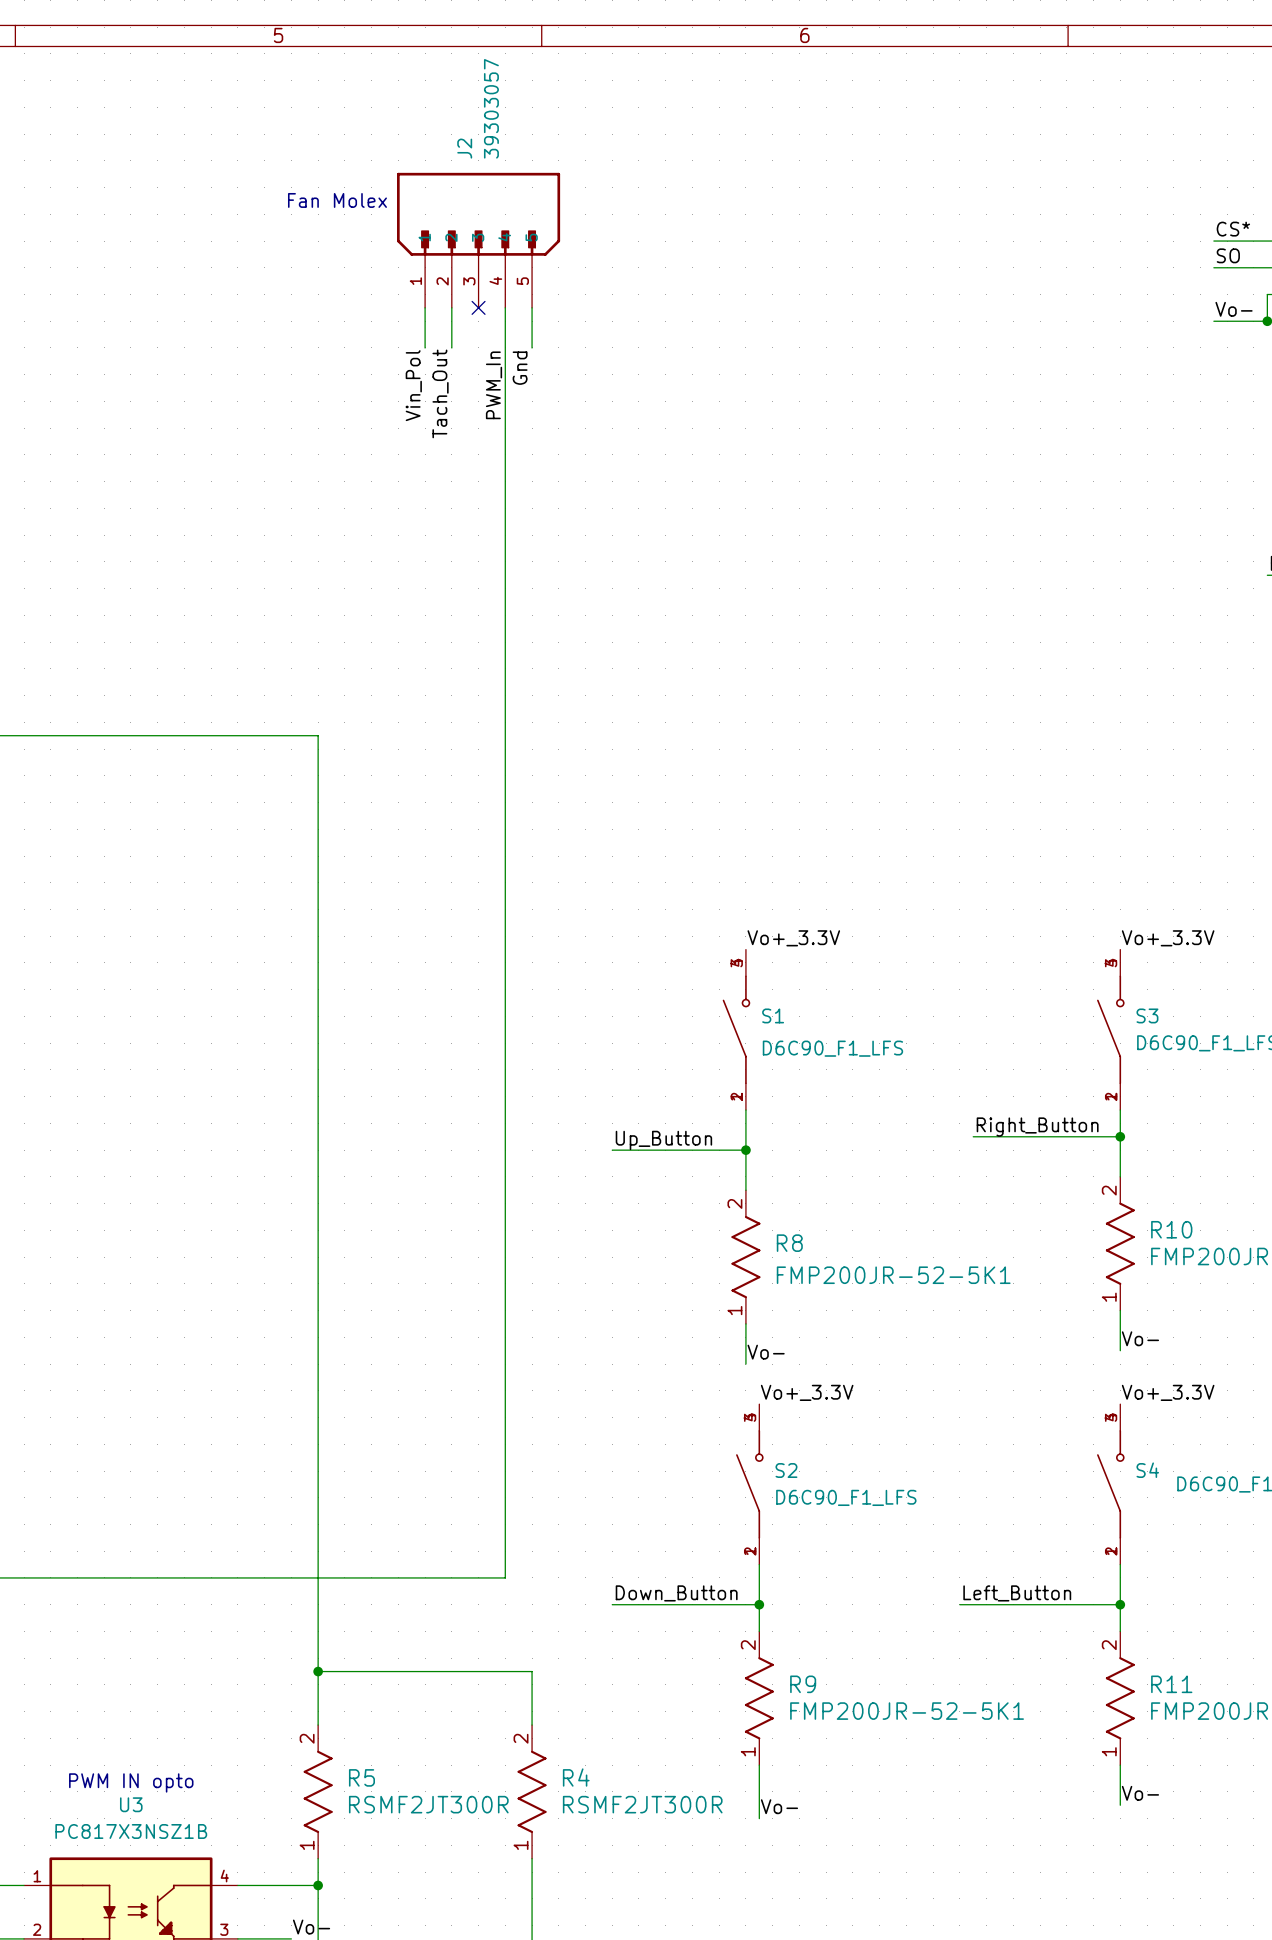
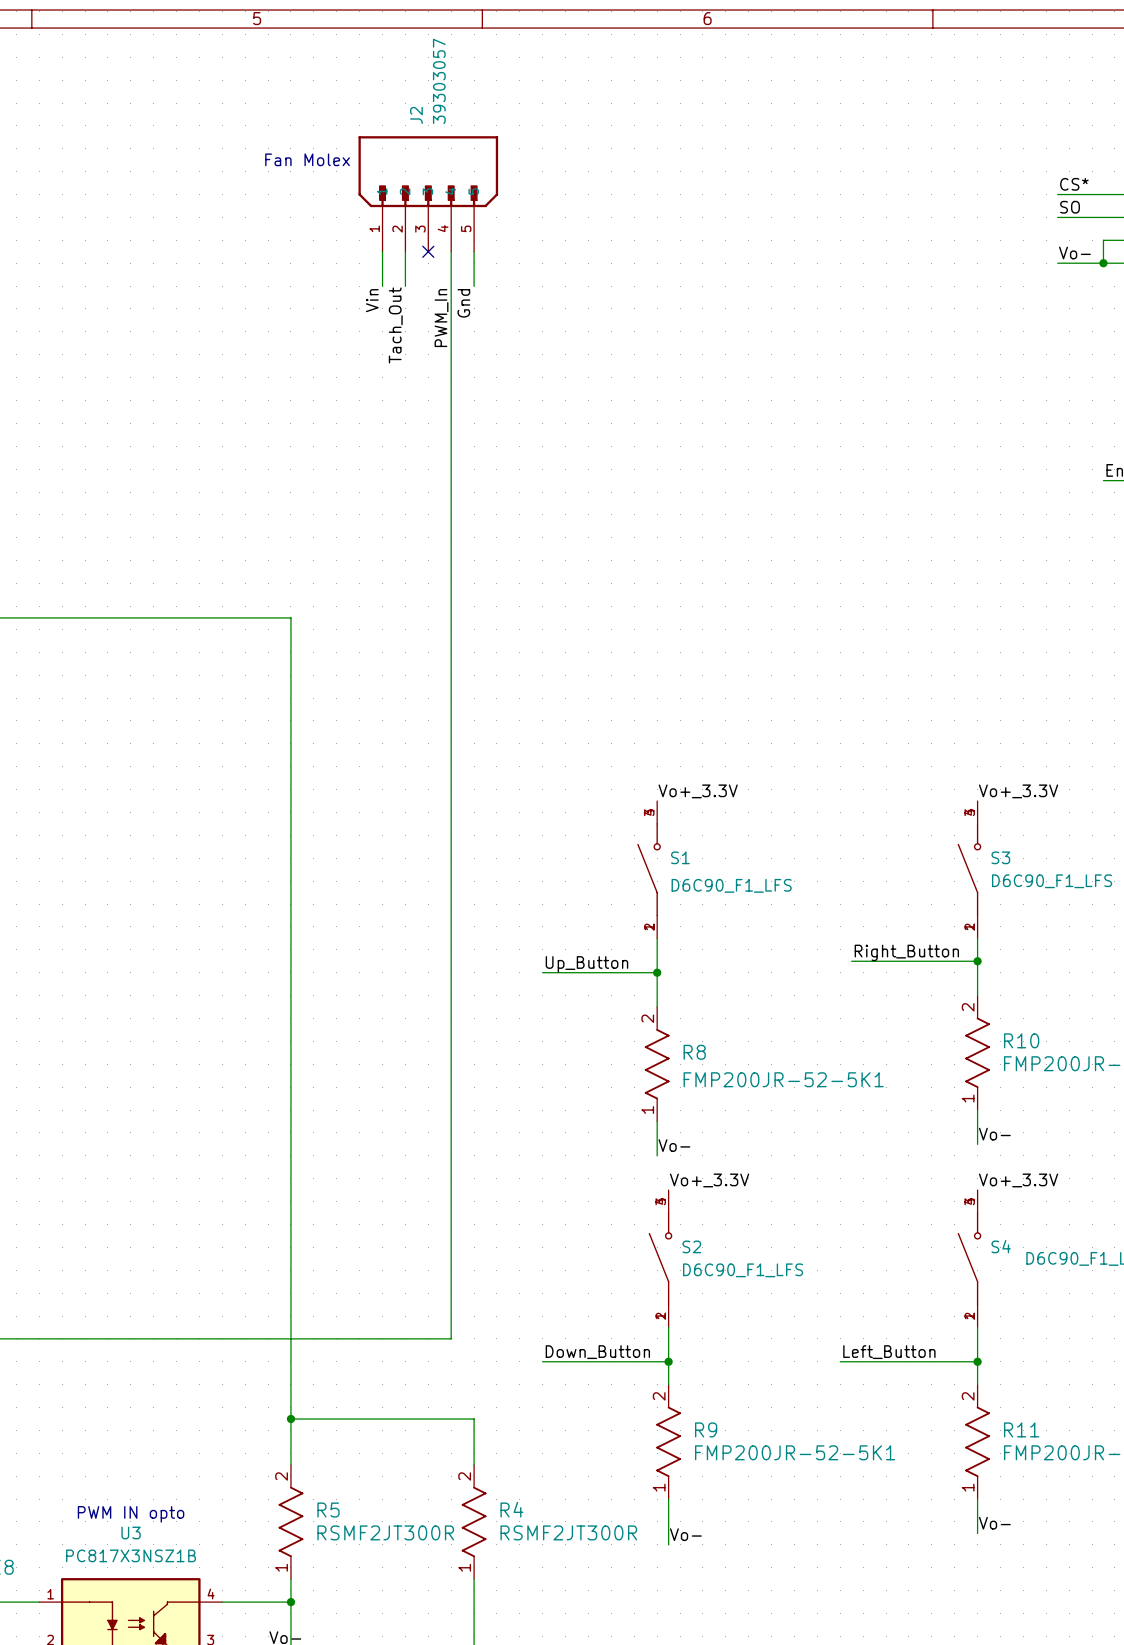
label: Vin_Pol (413, 385) -> Vin (372, 300)

